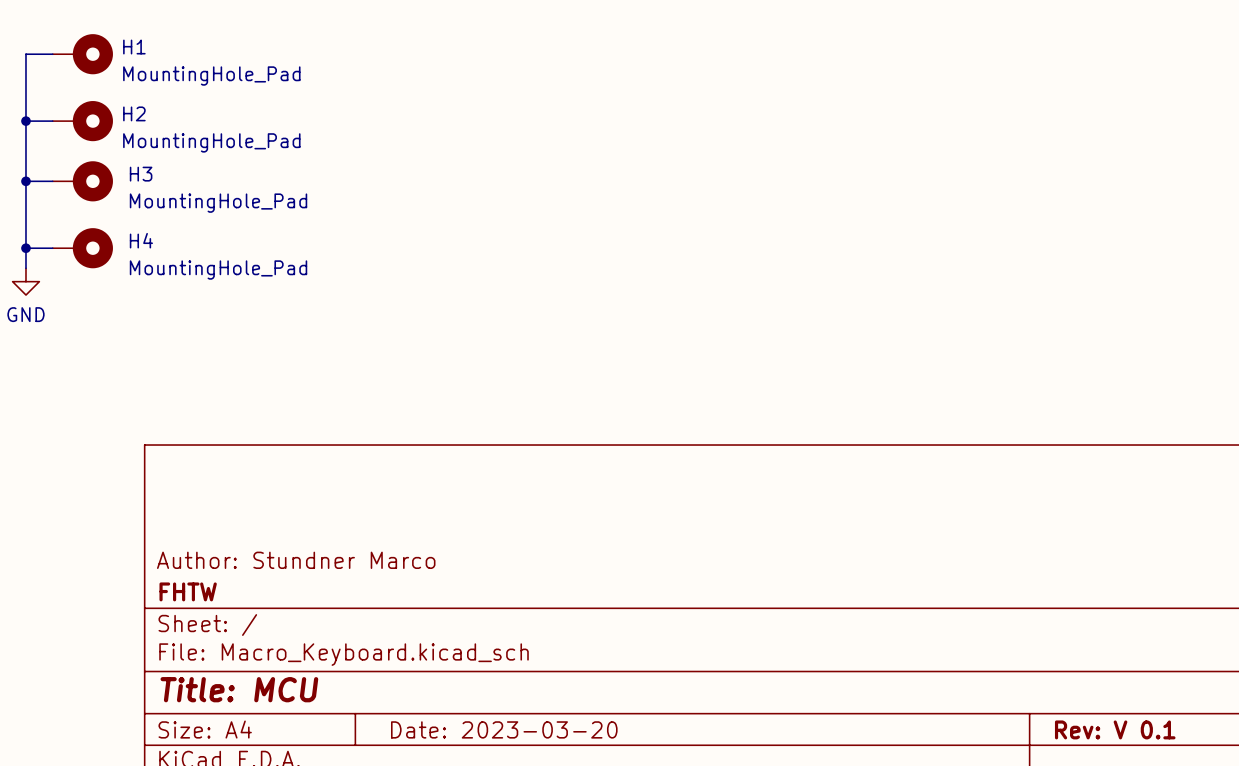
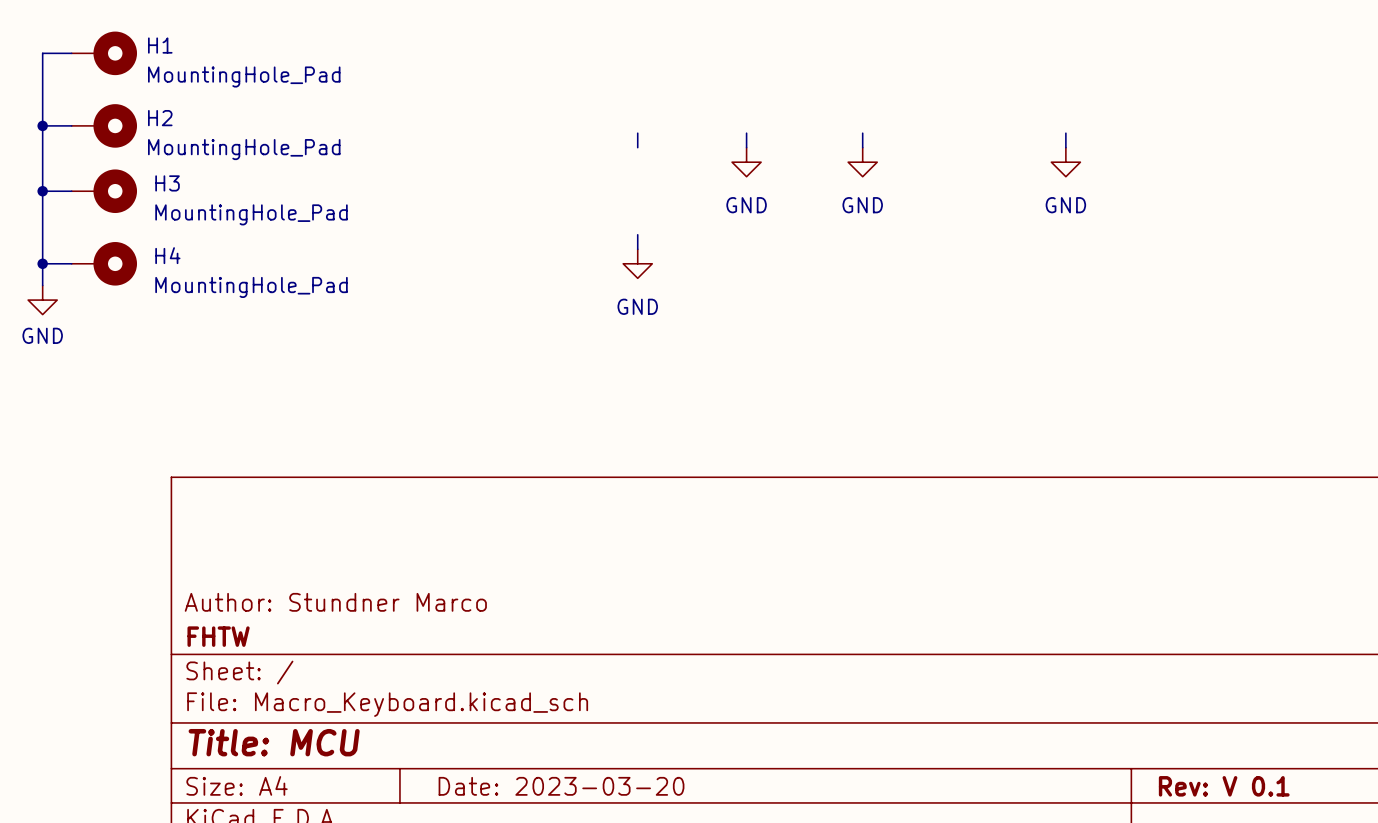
wire: none -> (637, 133) (637, 147)
wire: none -> (746, 133) (746, 147)
wire: none -> (862, 133) (862, 147)
wire: none -> (1065, 133) (1065, 147)
power symbol: none -> GND (746, 162)
power symbol: none -> GND (862, 162)
power symbol: none -> GND (1065, 162)
wire: none -> (637, 234) (637, 249)
power symbol: none -> GND (637, 263)

